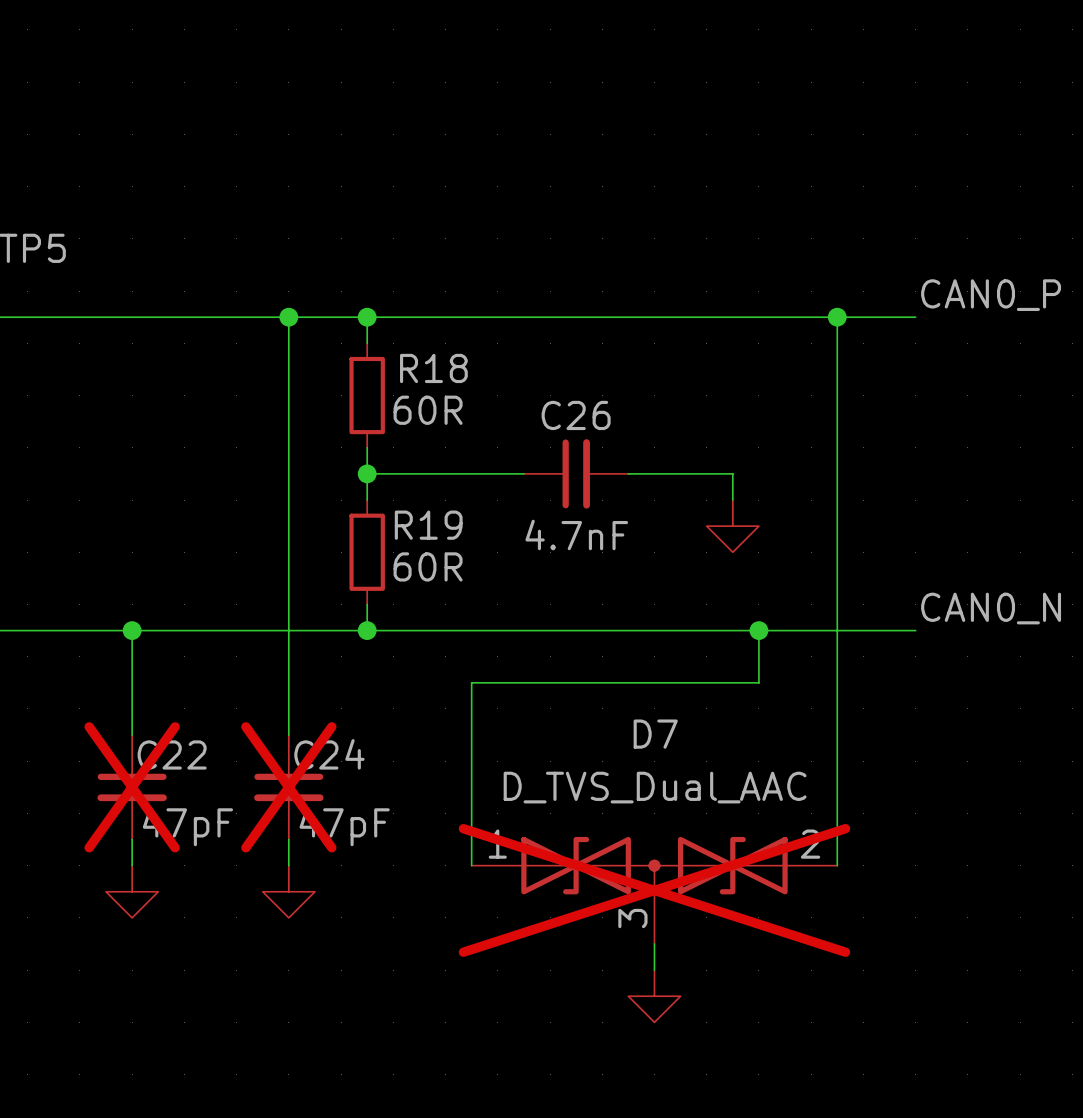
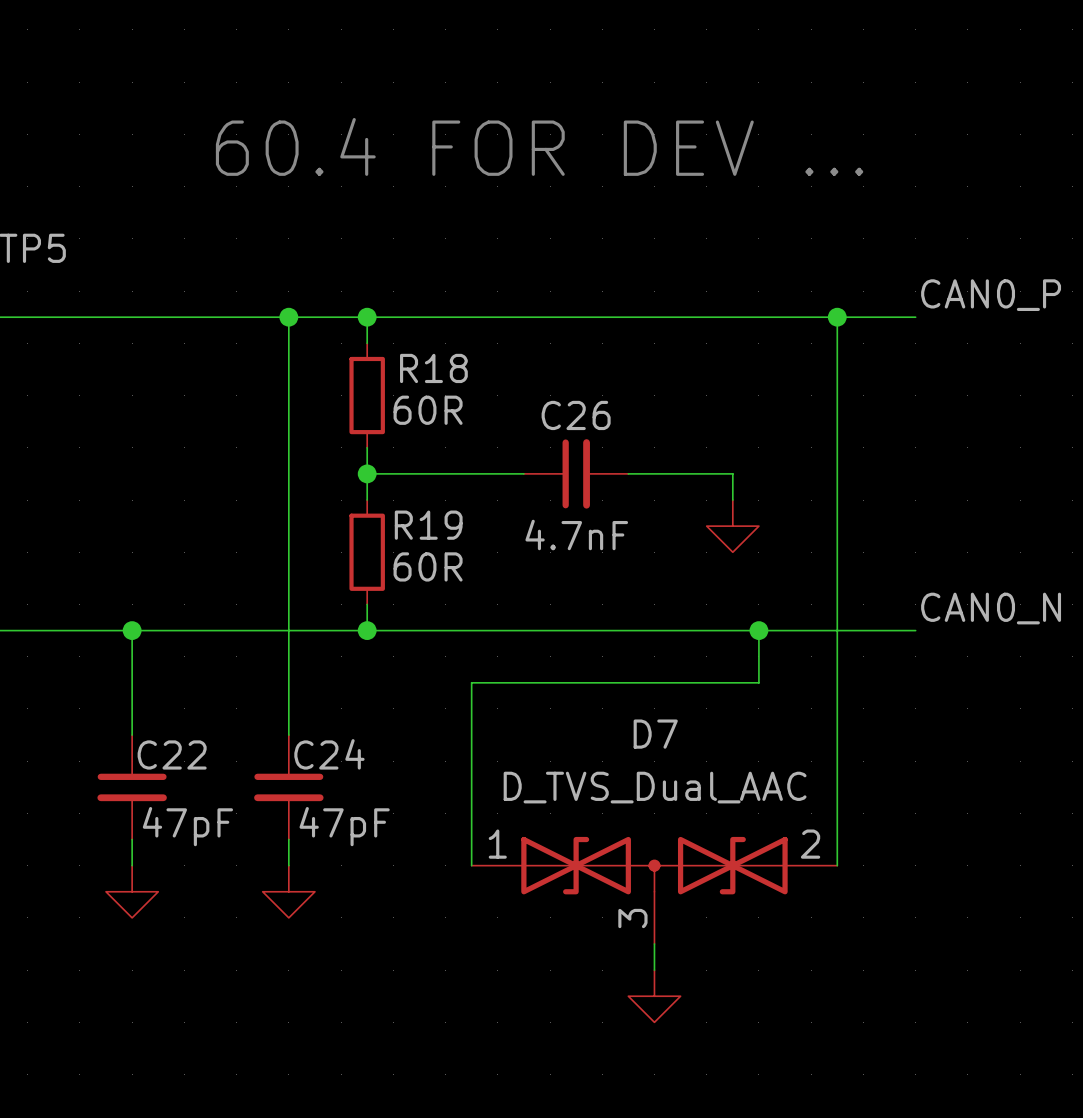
text: none -> 60.4 FOR DEV ... (539, 146)
C22 do-not-place cross: (132, 787) -> none
C24 do-not-place cross: (288, 787) -> none
D7 do-not-place cross: (654, 890) -> none

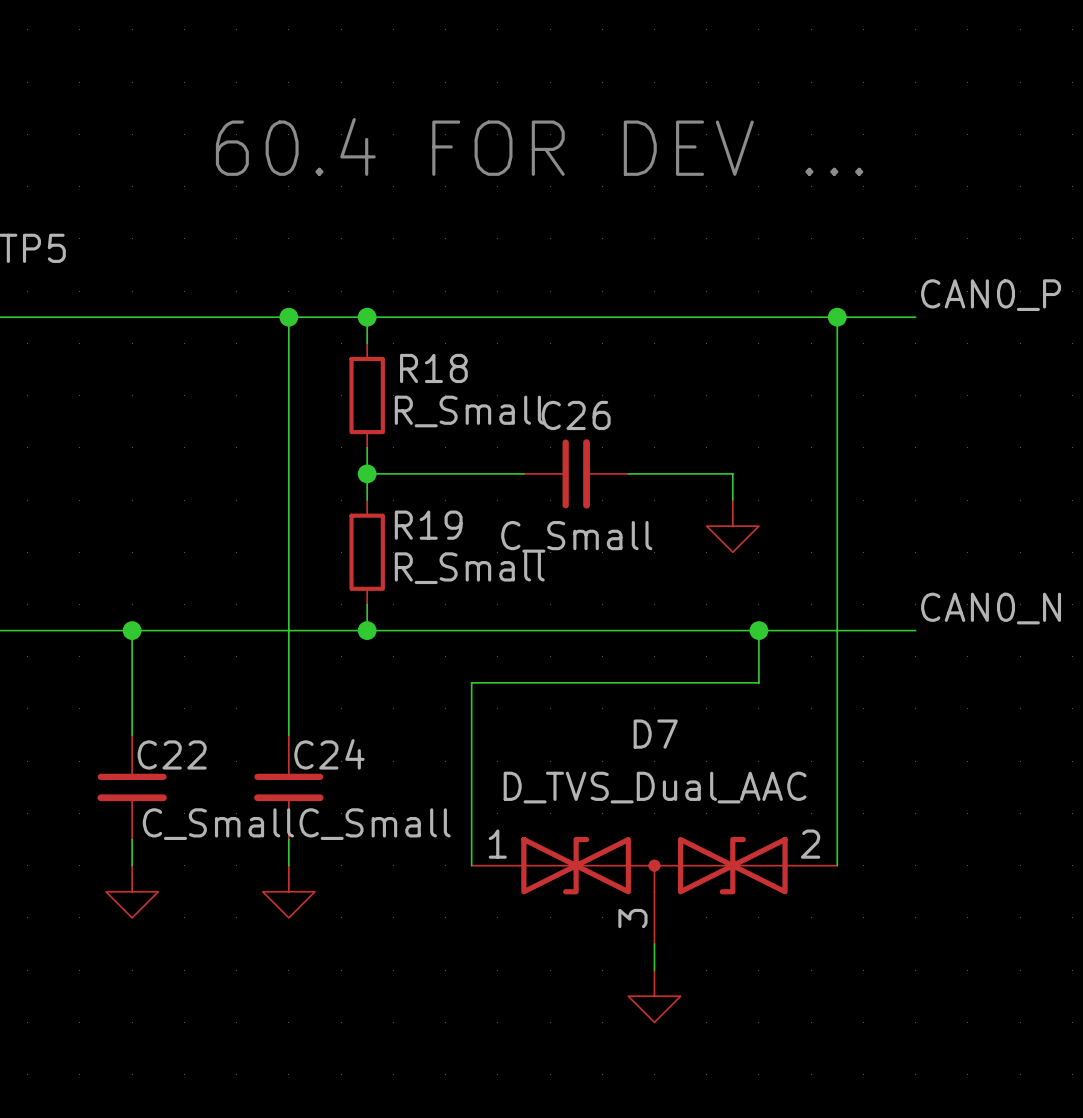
R18 value: 60R (428, 410) -> R_Small (469, 411)
C26 value: 4.7nF (576, 534) -> C_Small (576, 536)
R19 value: 60R (428, 566) -> R_Small (469, 568)
C22 value: 47pF (187, 826) -> C_Small (218, 824)
C24 value: 47pF (344, 826) -> C_Small (375, 824)

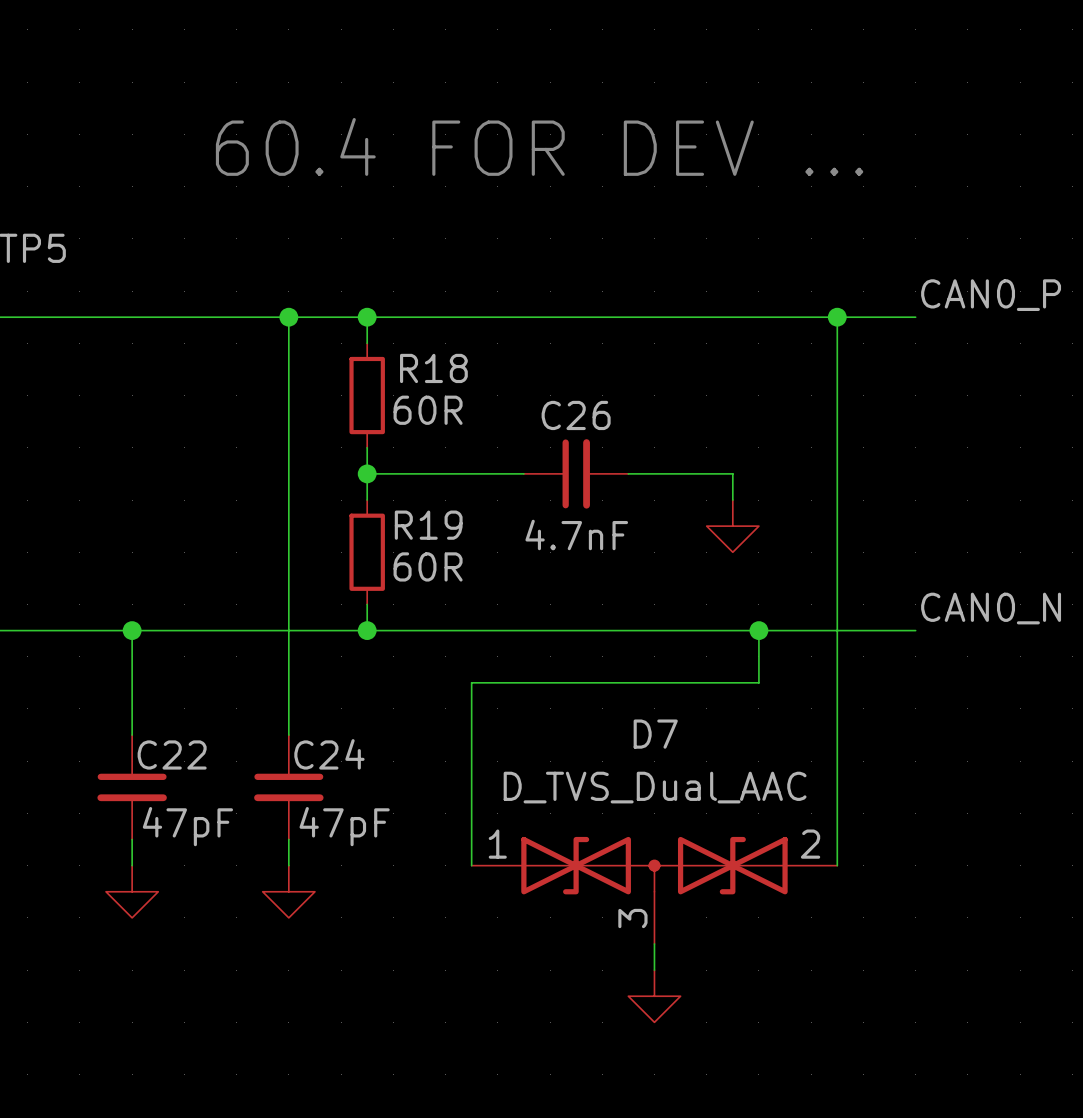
R18 value: R_Small (469, 411) -> 60R (428, 410)
C26 value: C_Small (576, 536) -> 4.7nF (576, 534)
R19 value: R_Small (469, 568) -> 60R (428, 566)
C22 value: C_Small (218, 824) -> 47pF (187, 826)
C24 value: C_Small (375, 824) -> 47pF (344, 826)

